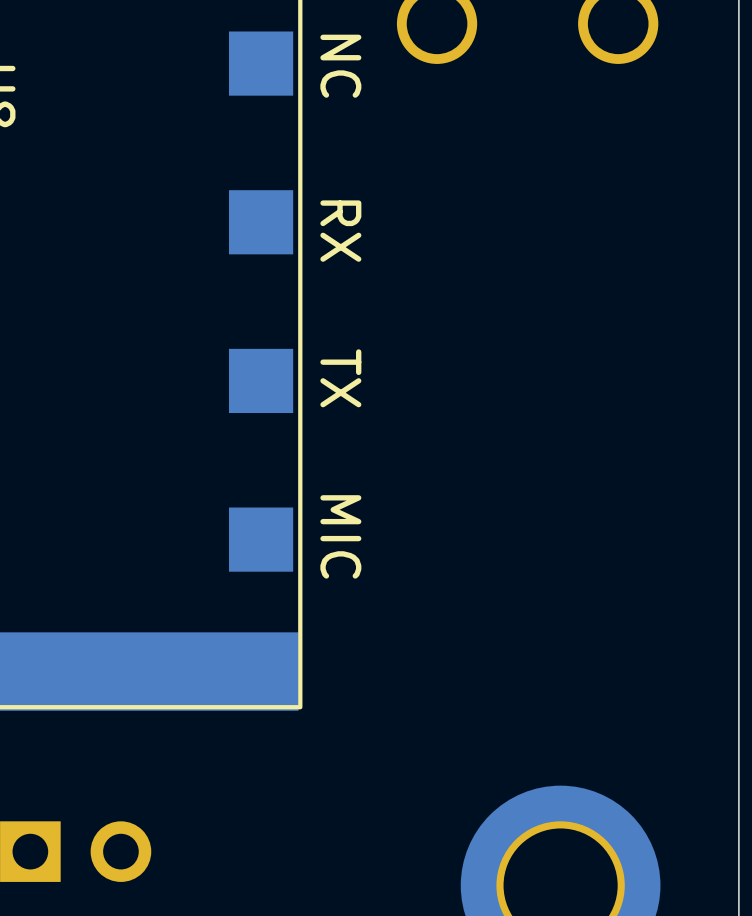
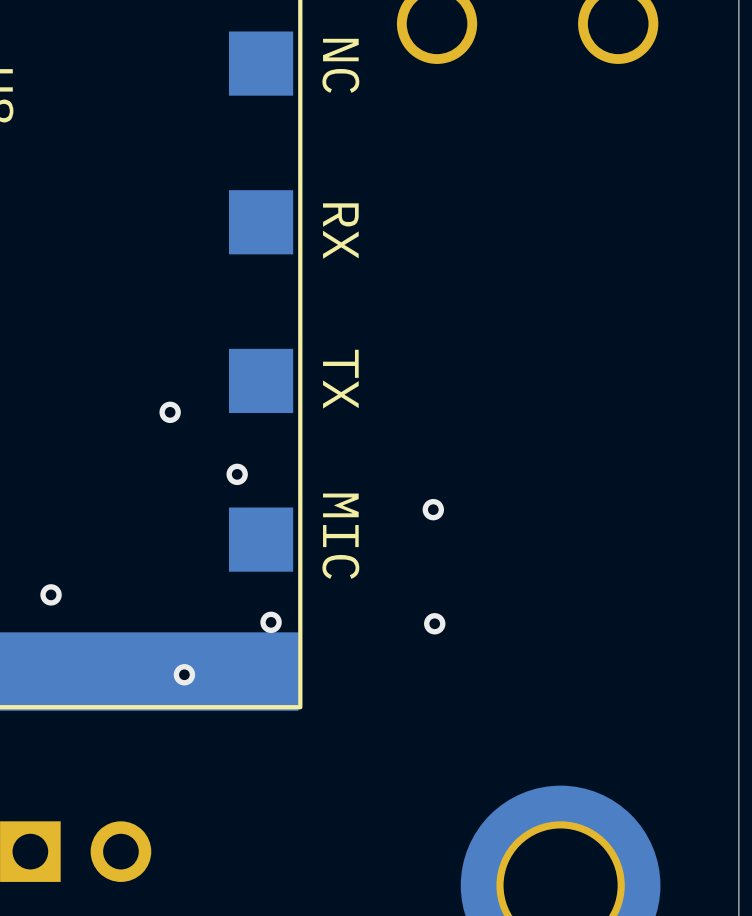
via: none -> (170, 412)
via: none -> (237, 474)
via: none -> (433, 509)
via: none -> (51, 594)
via: none -> (271, 622)
via: none -> (434, 623)
via: none -> (184, 674)

